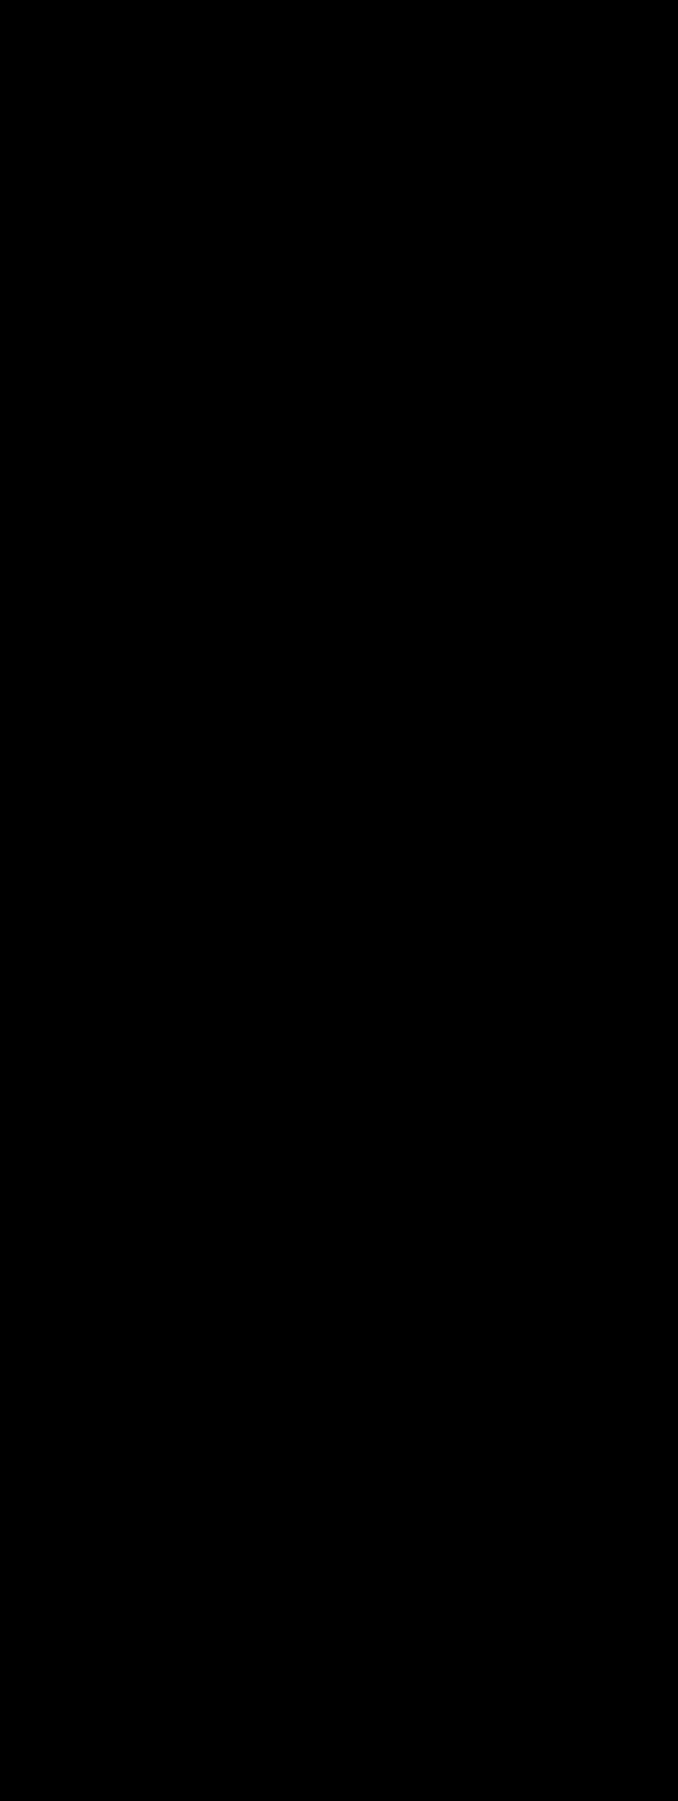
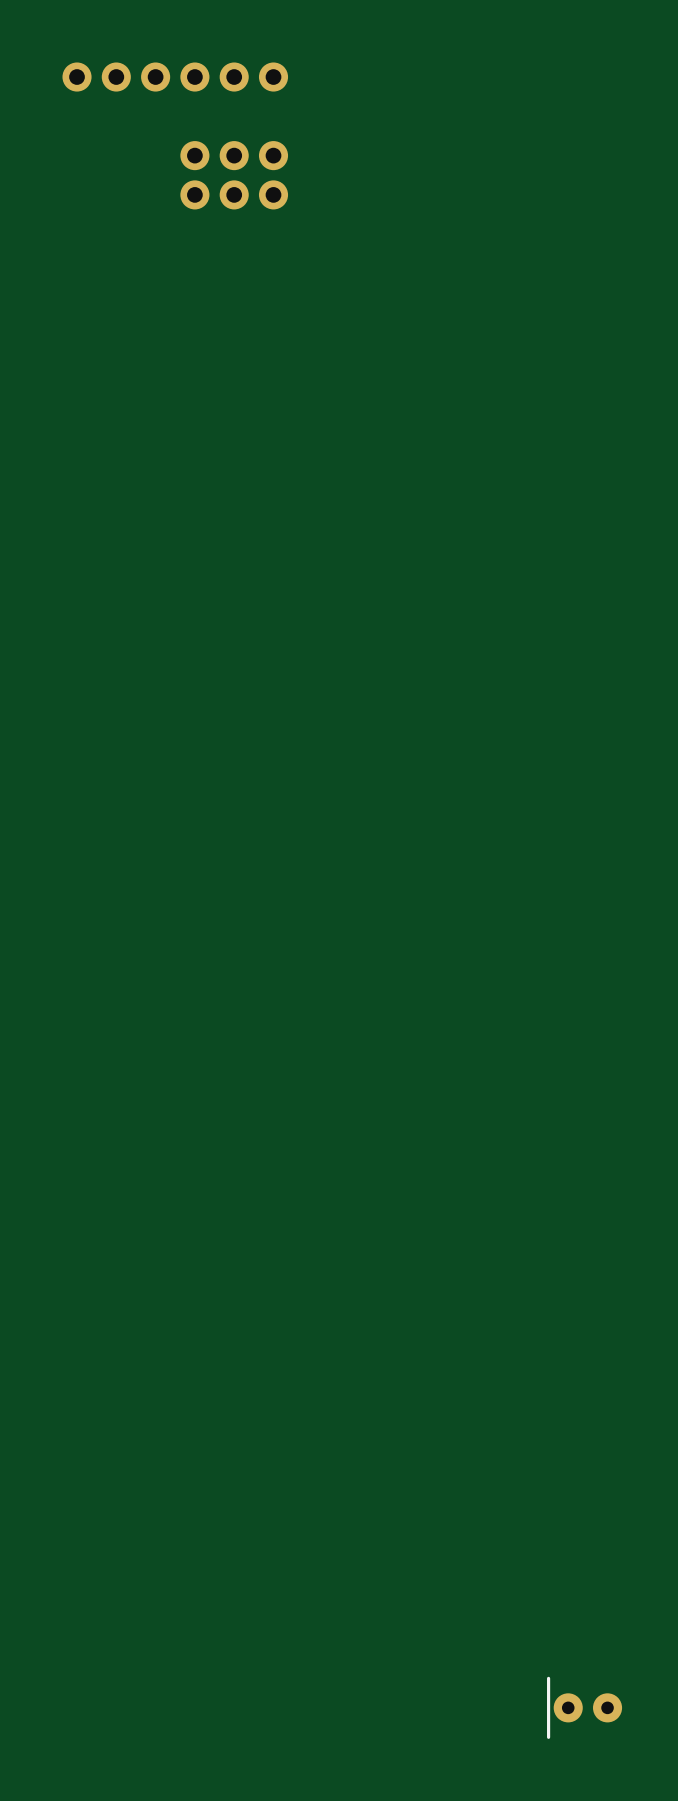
part: none -> (175, 77)
part: none -> (234, 175)
part: none -> (584, 1707)

